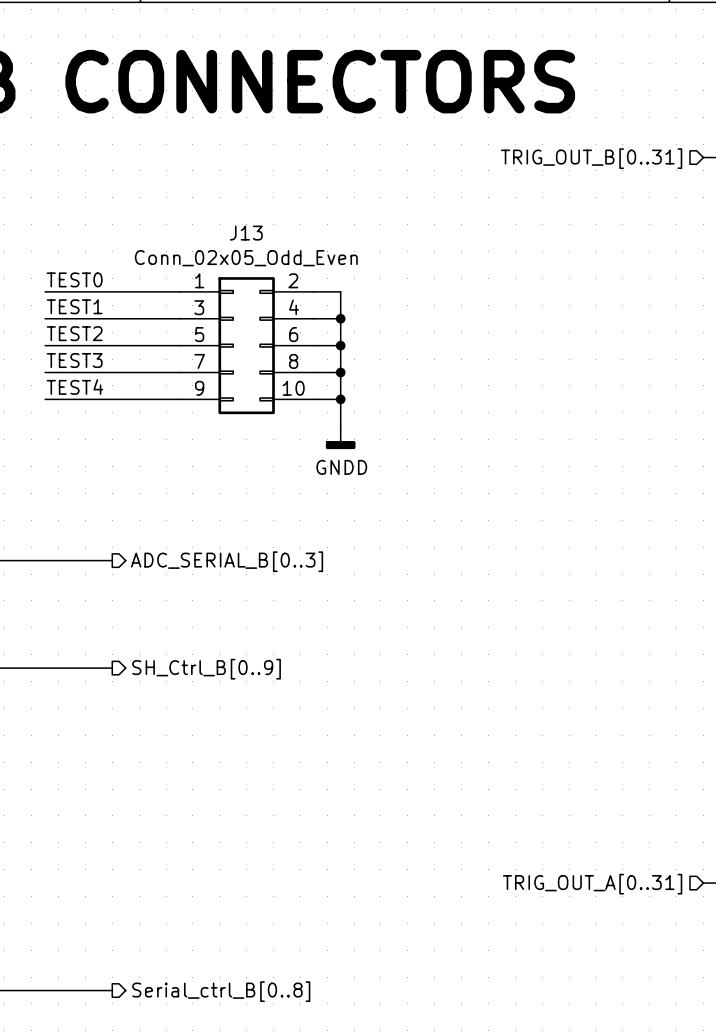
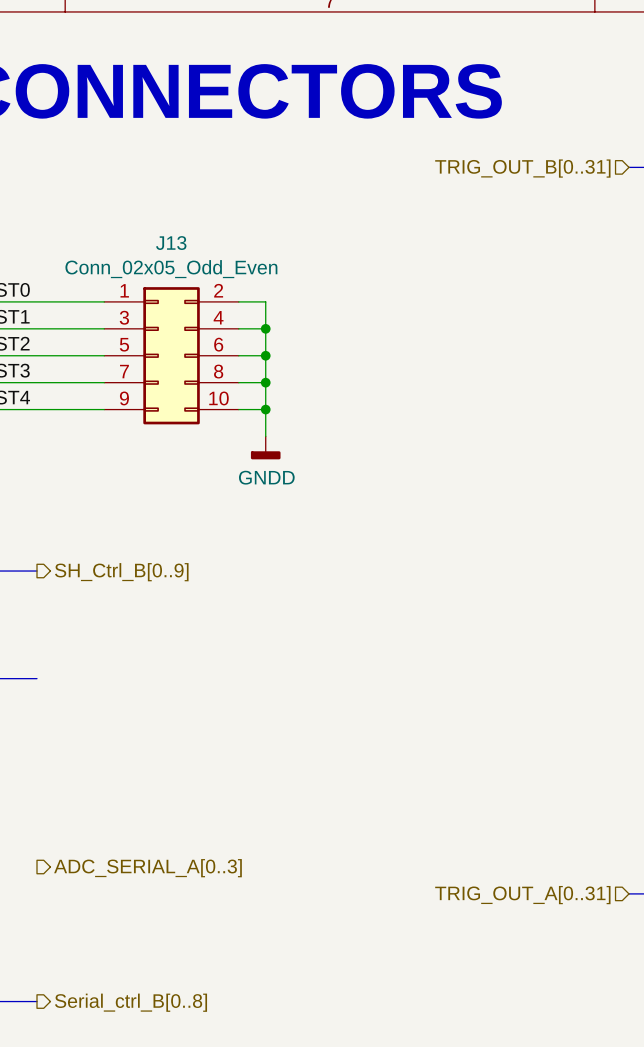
hierarchical label: ADC_SERIAL_B[0..3] (227, 561) -> SH_Ctrl_B[0..9] (121, 572)
hierarchical label: SH_Ctrl_B[0..9] (206, 669) -> none
hierarchical label: none -> ADC_SERIAL_A[0..3] (147, 868)

